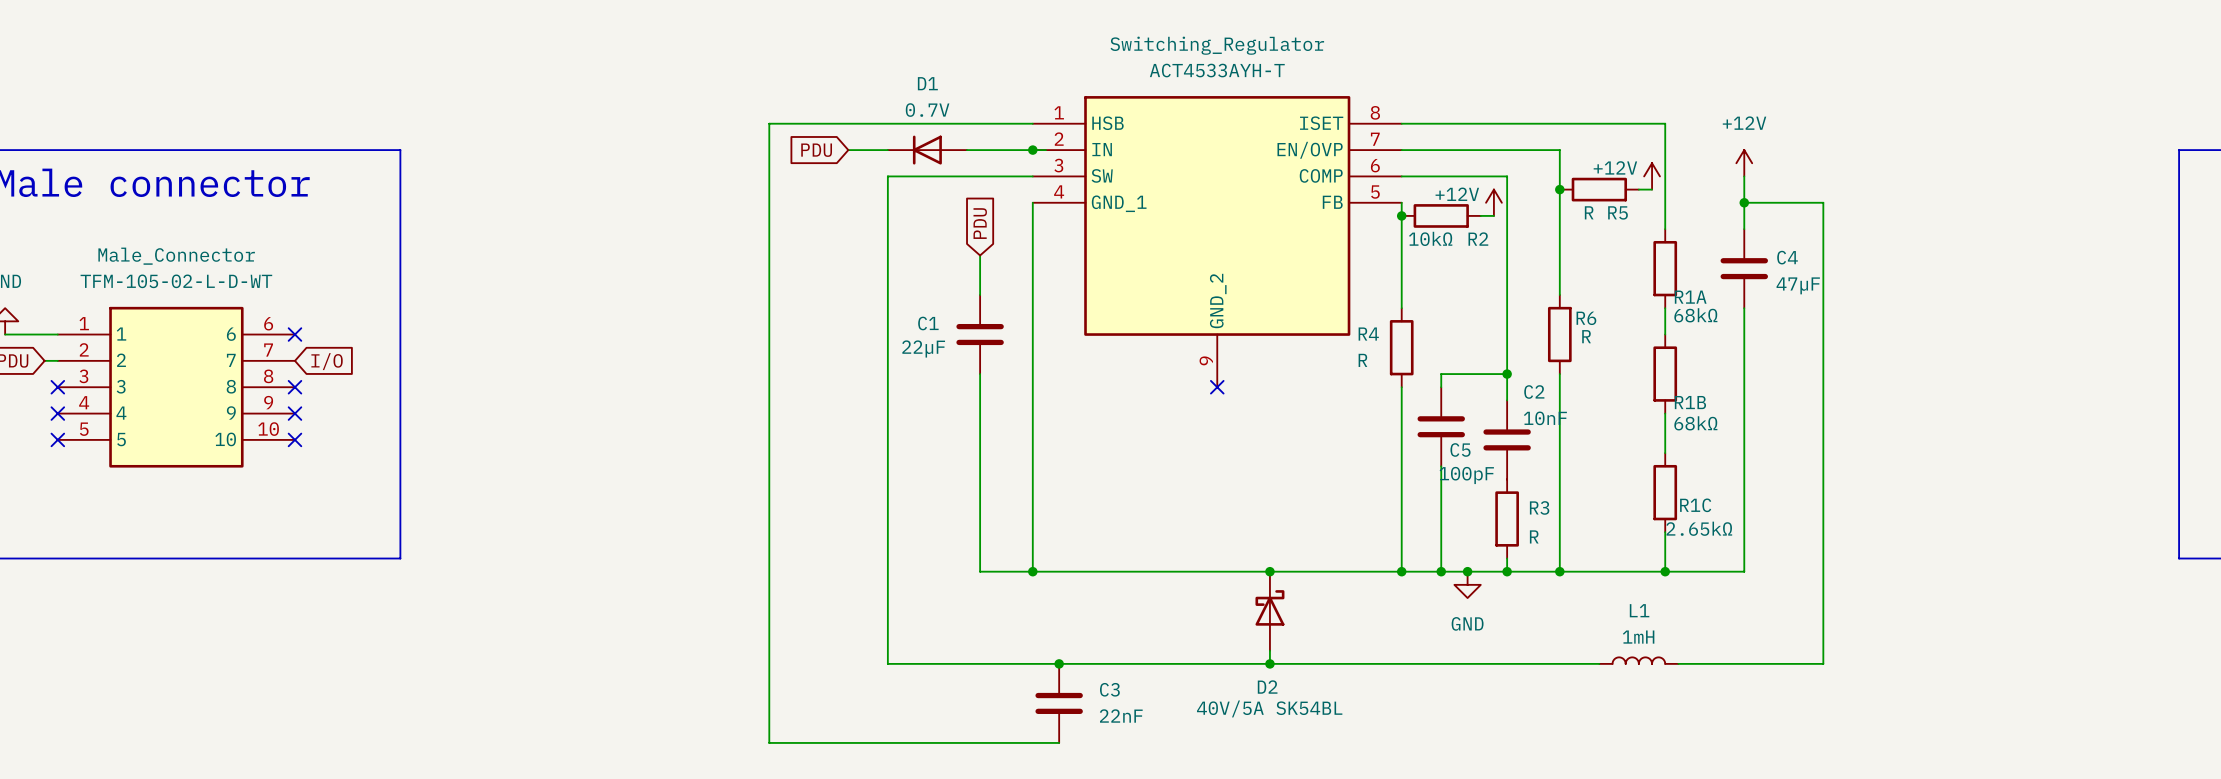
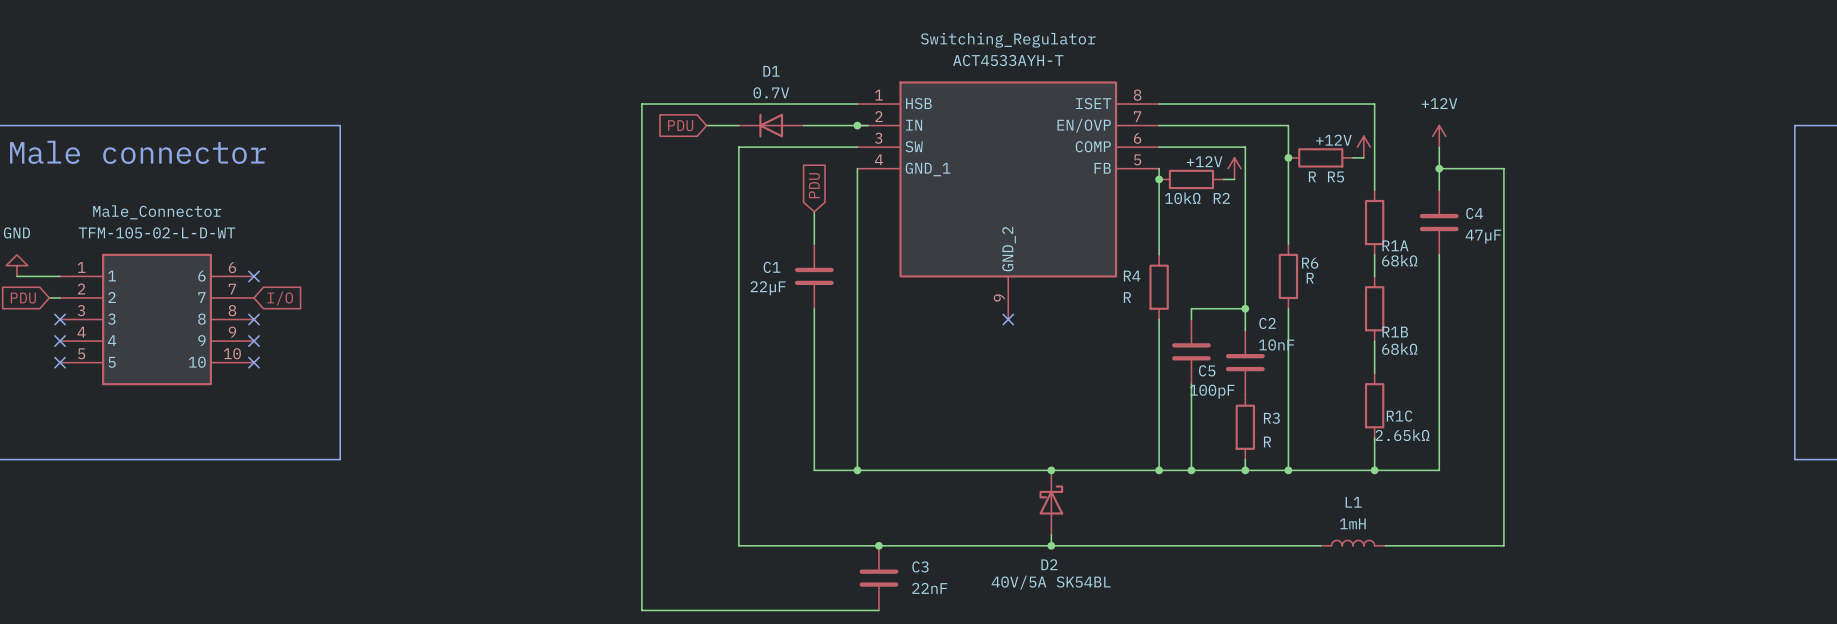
junction: (1467, 571) -> none
power symbol: GND (1467, 584) -> none

